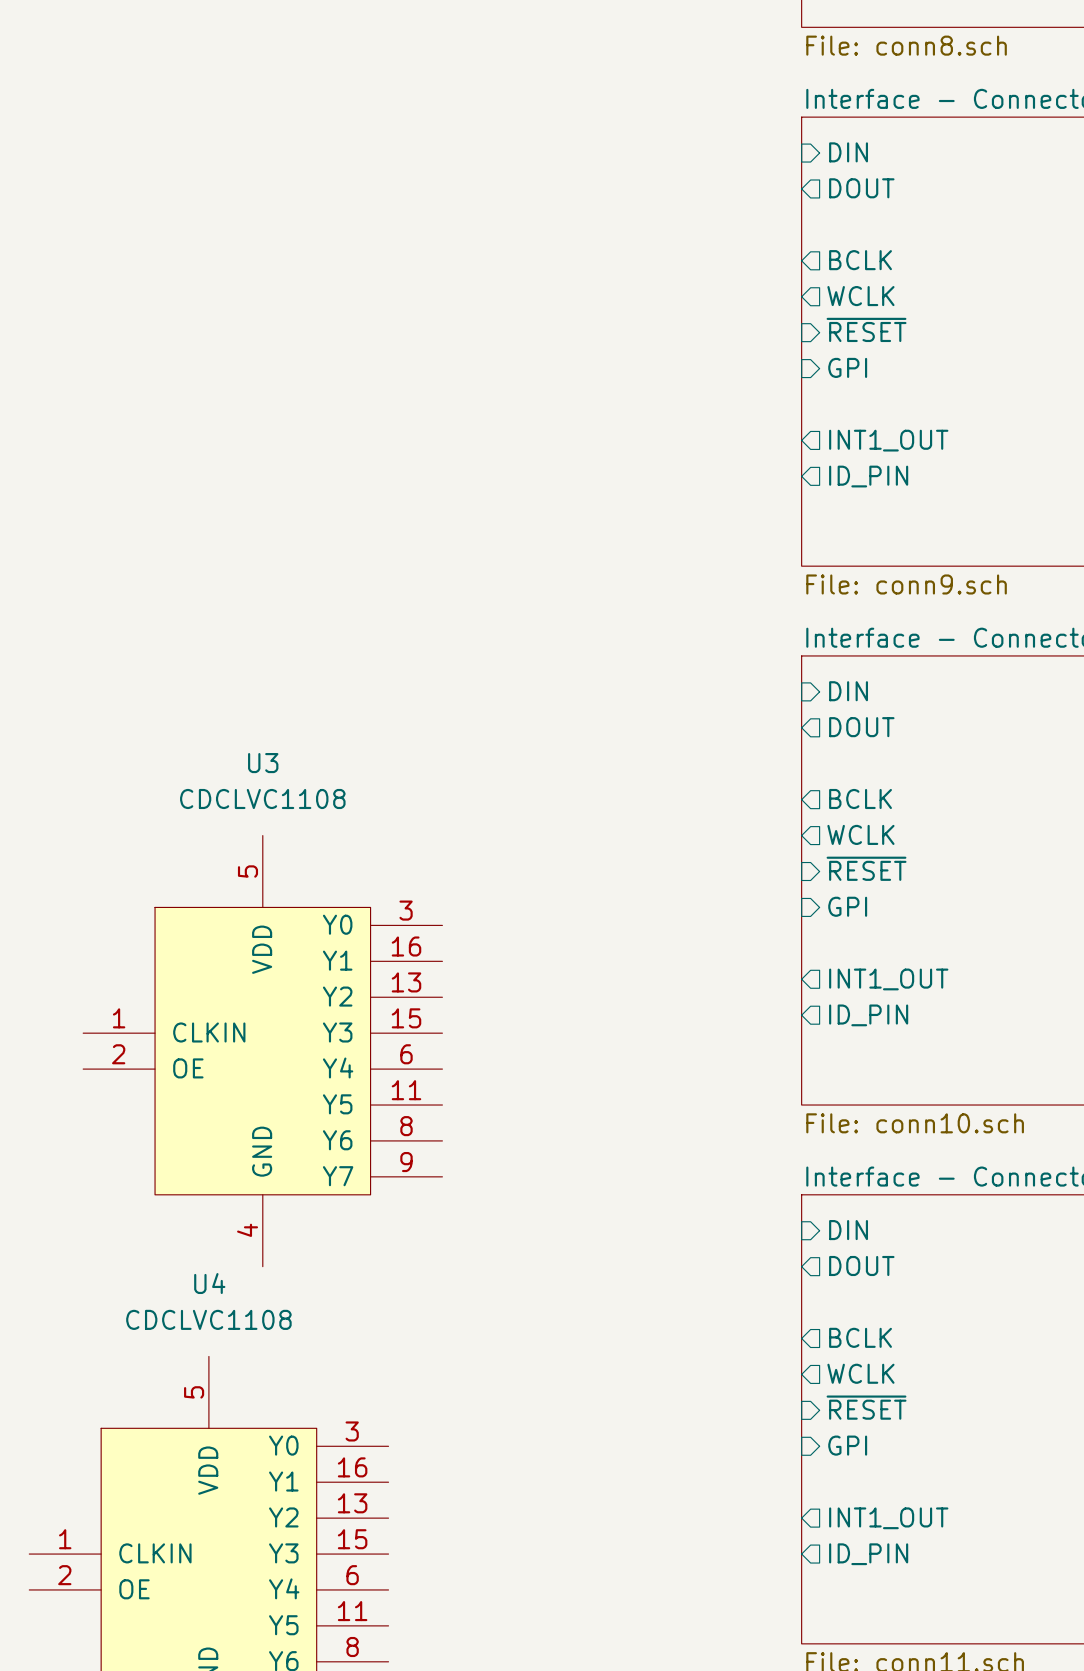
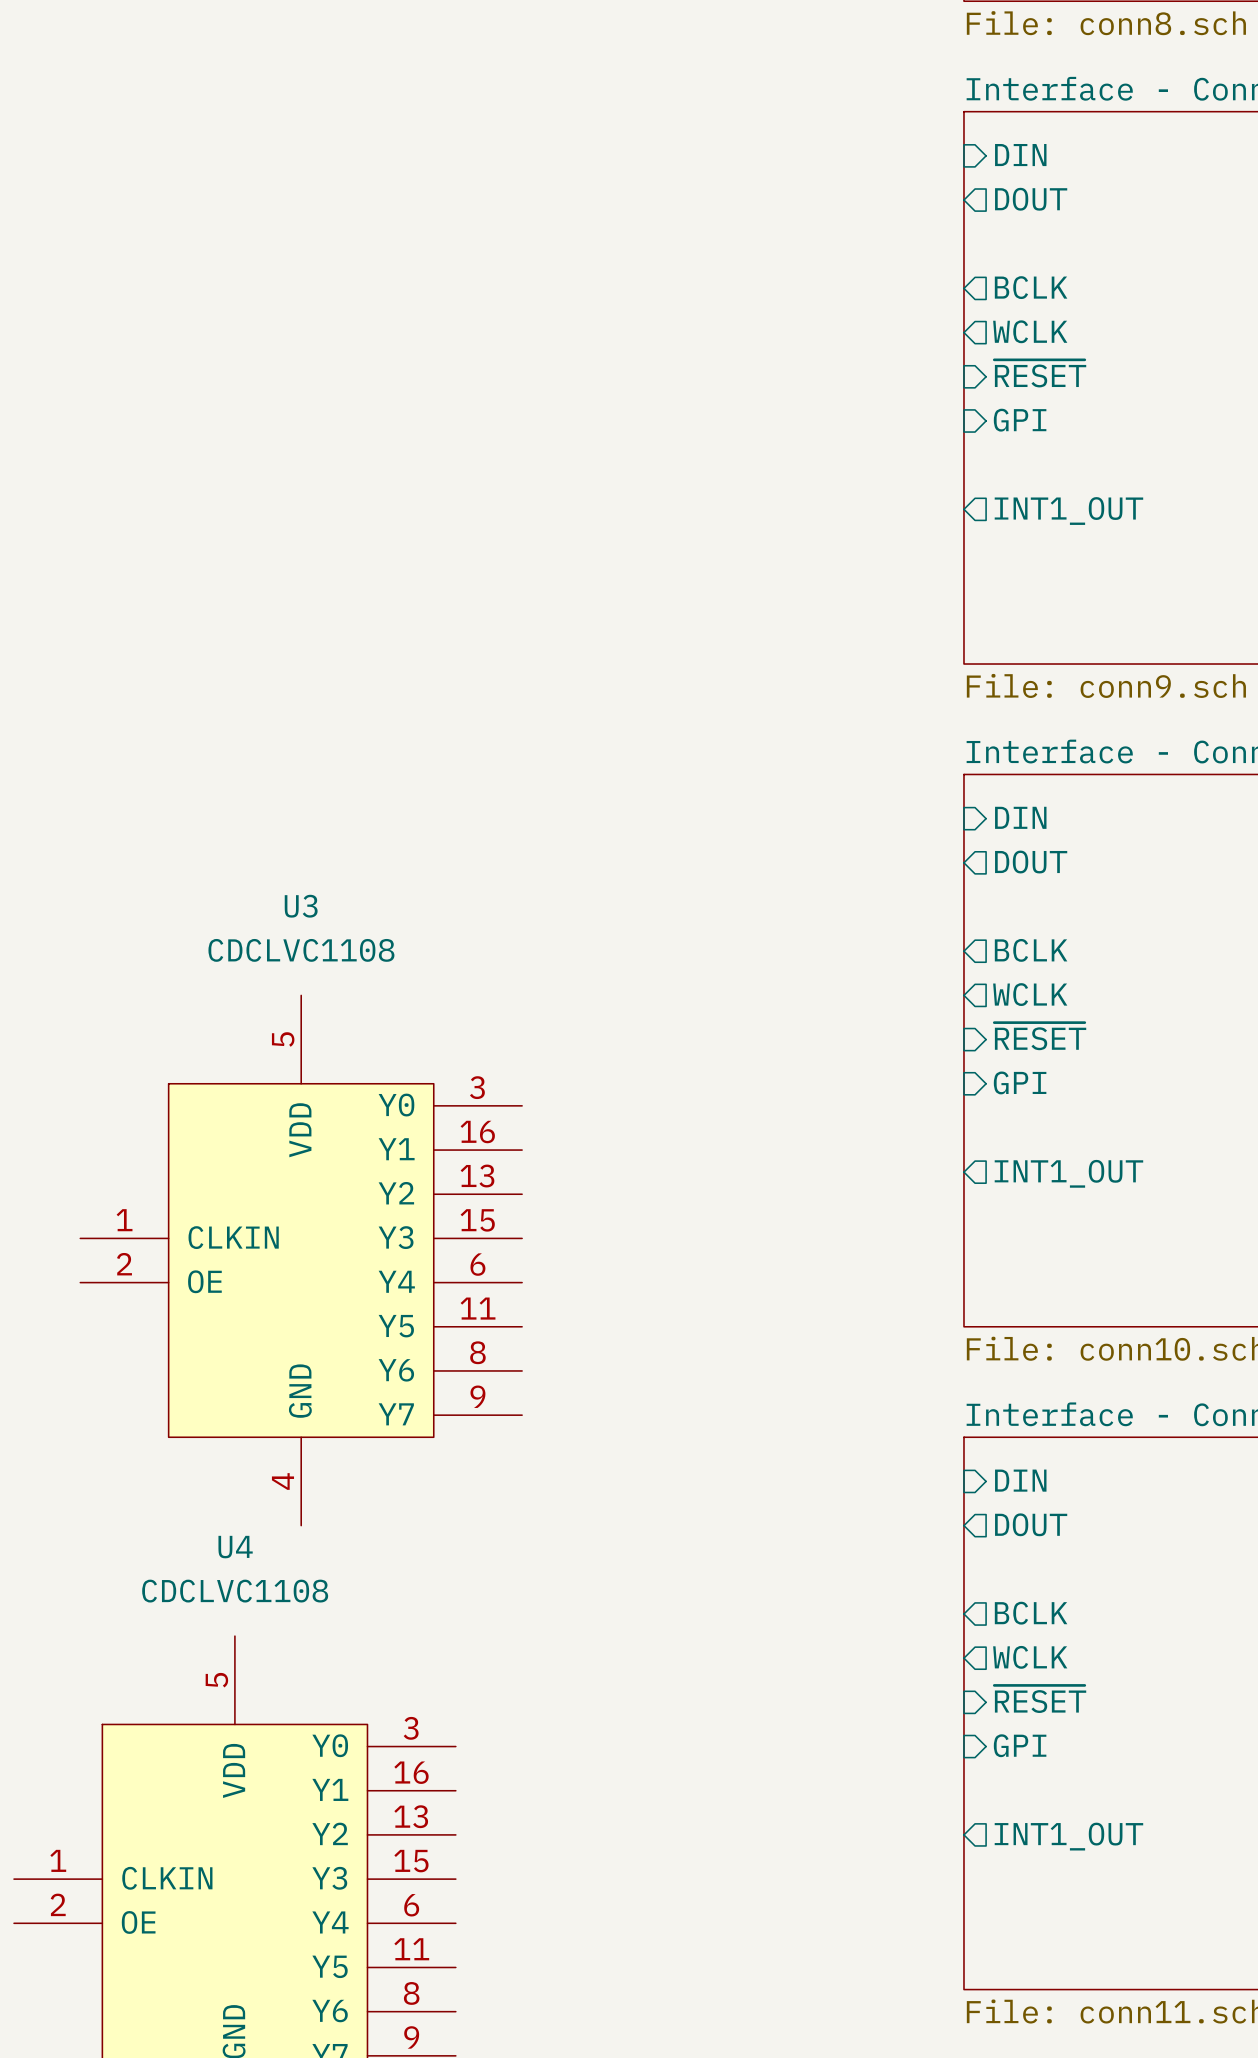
sheet pin: ID_PIN (868, 476) -> none
sheet pin: ID_PIN (868, 1015) -> none
sheet pin: ID_PIN (868, 1554) -> none

